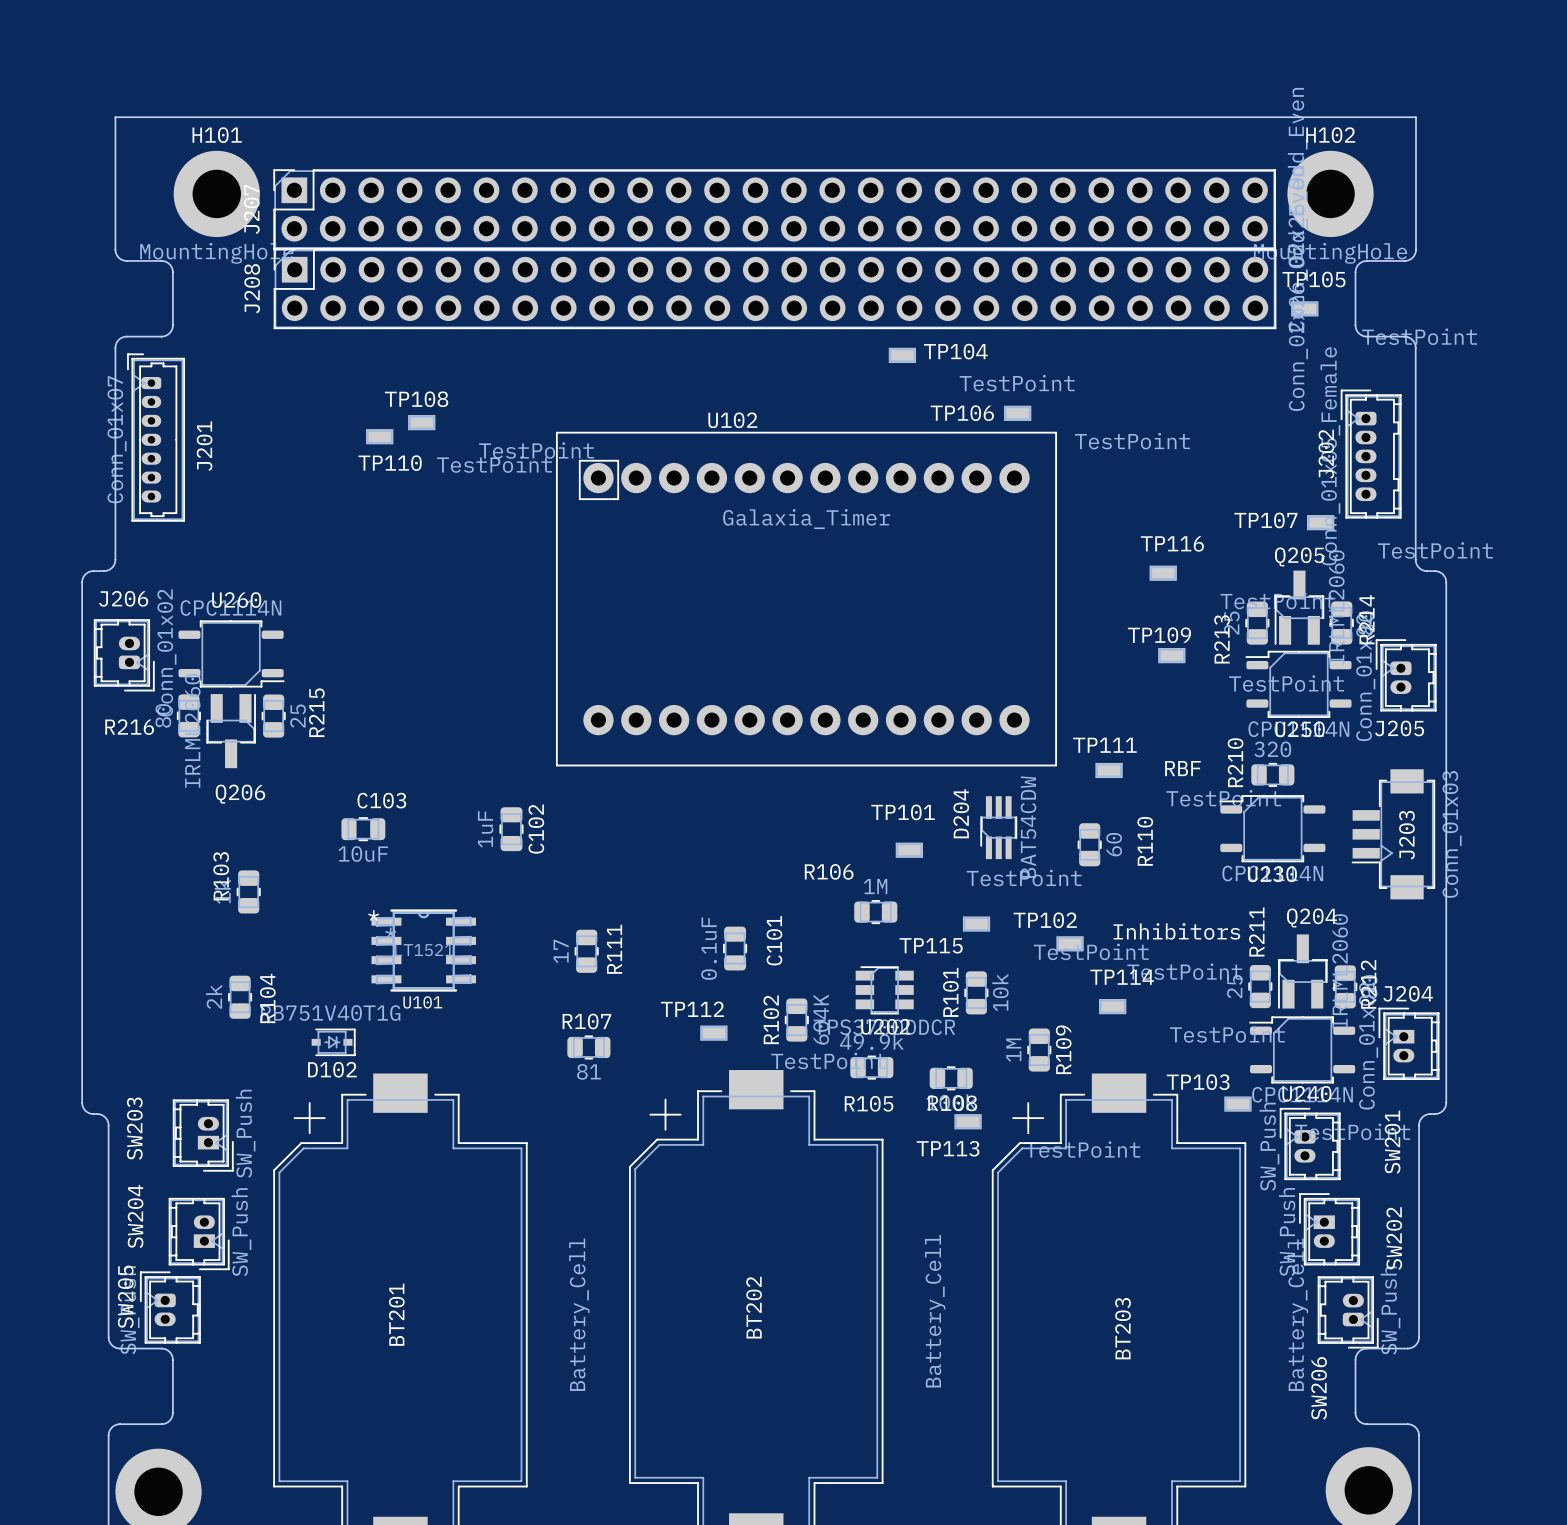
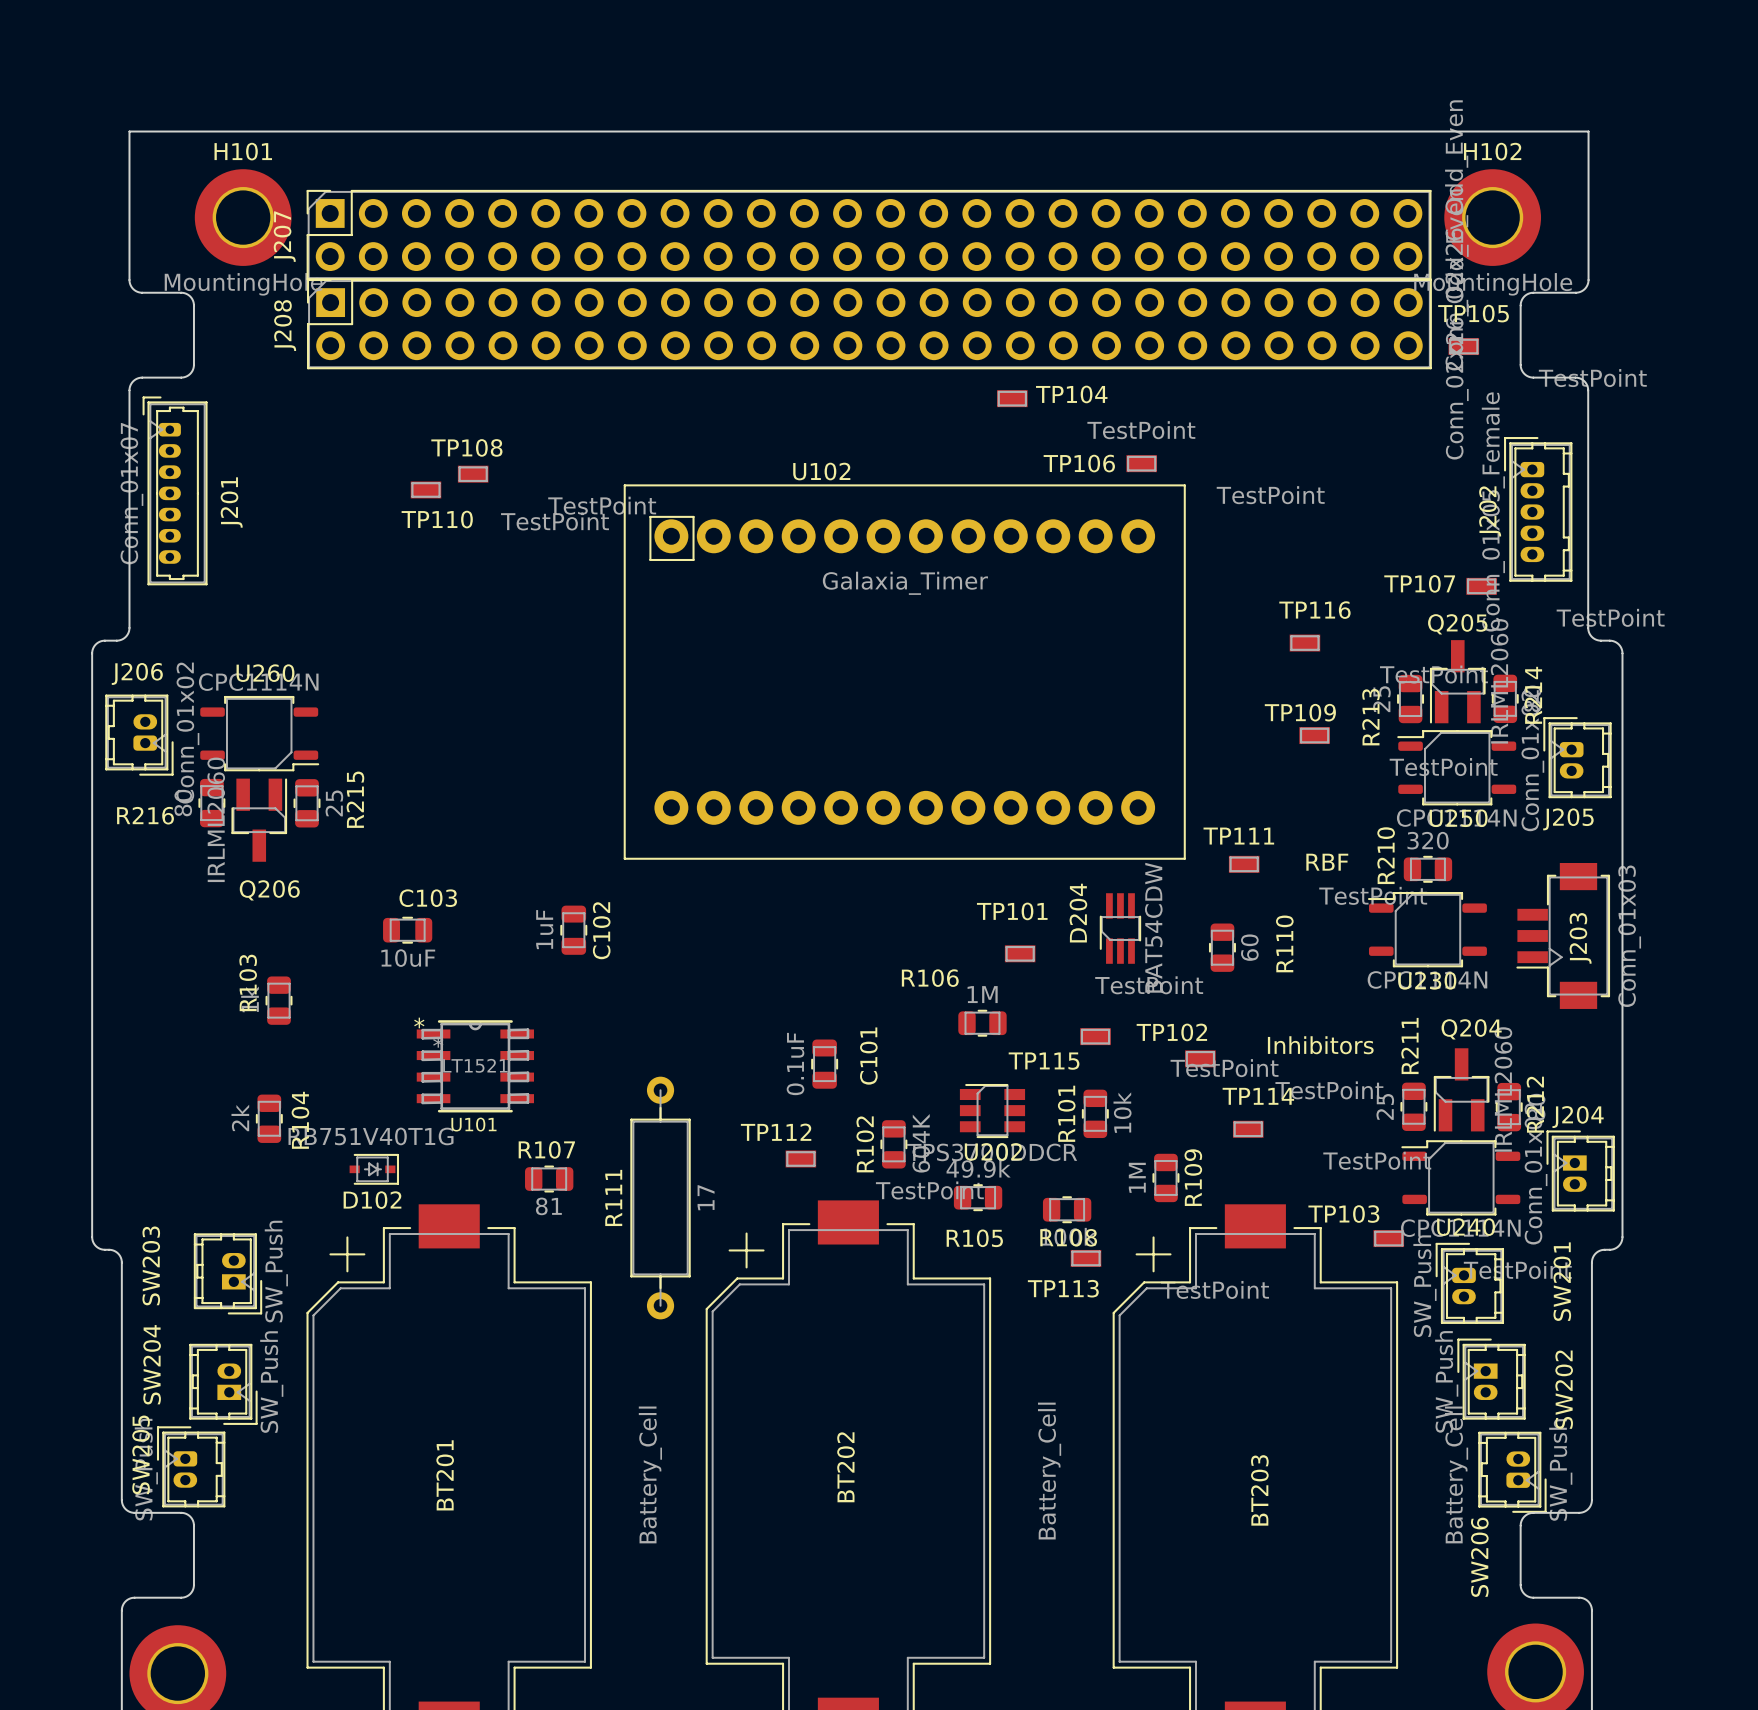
R111 footprint: [574, 929, 599, 973] -> [630, 1076, 691, 1320]
R111 name position: R111 (614, 949) -> R111 (613, 1197)
R111 value position: 17 (561, 951) -> 17 (706, 1197)
R107 position: (588, 1047) -> (549, 1179)

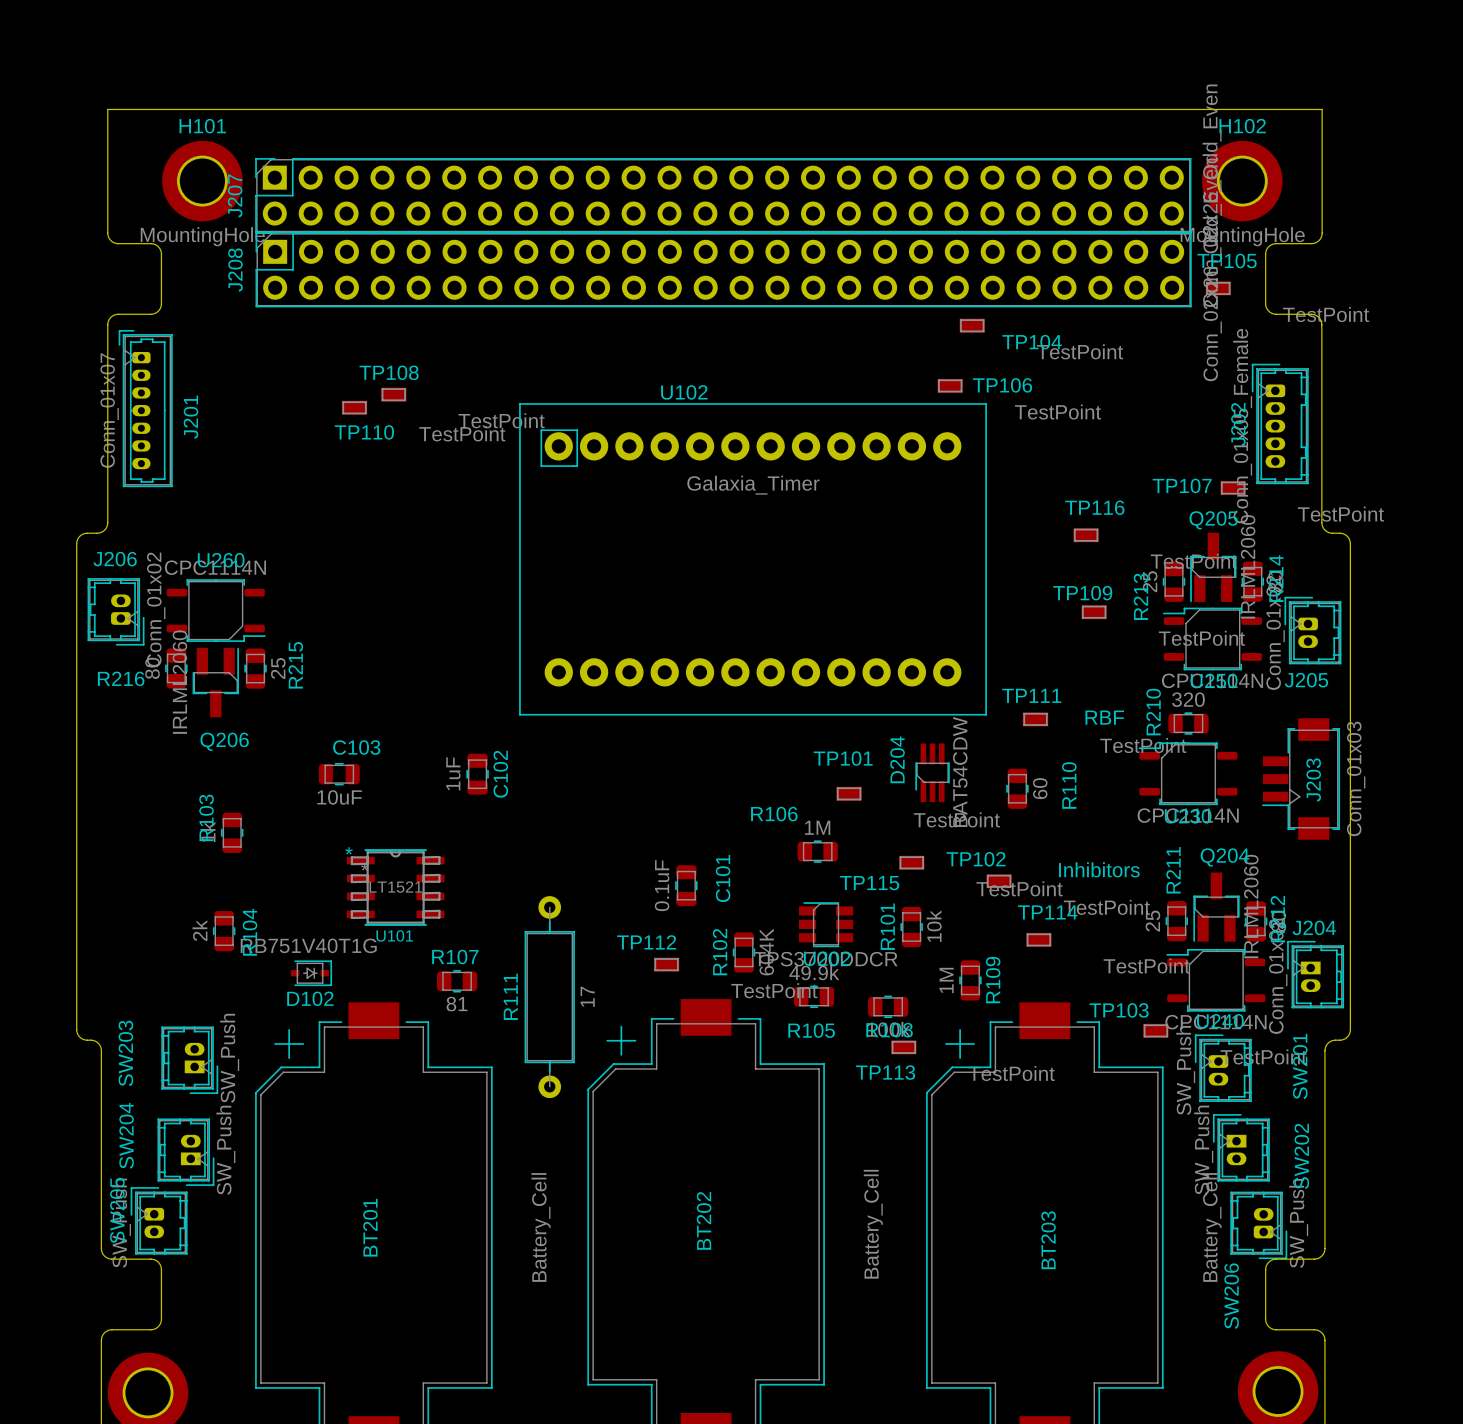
TP104 name position: TP104 (1071, 394) -> TP104 (1032, 342)
TP104 position: (1012, 398) -> (972, 325)
TP106 name position: TP106 (1079, 463) -> TP106 (1002, 385)

